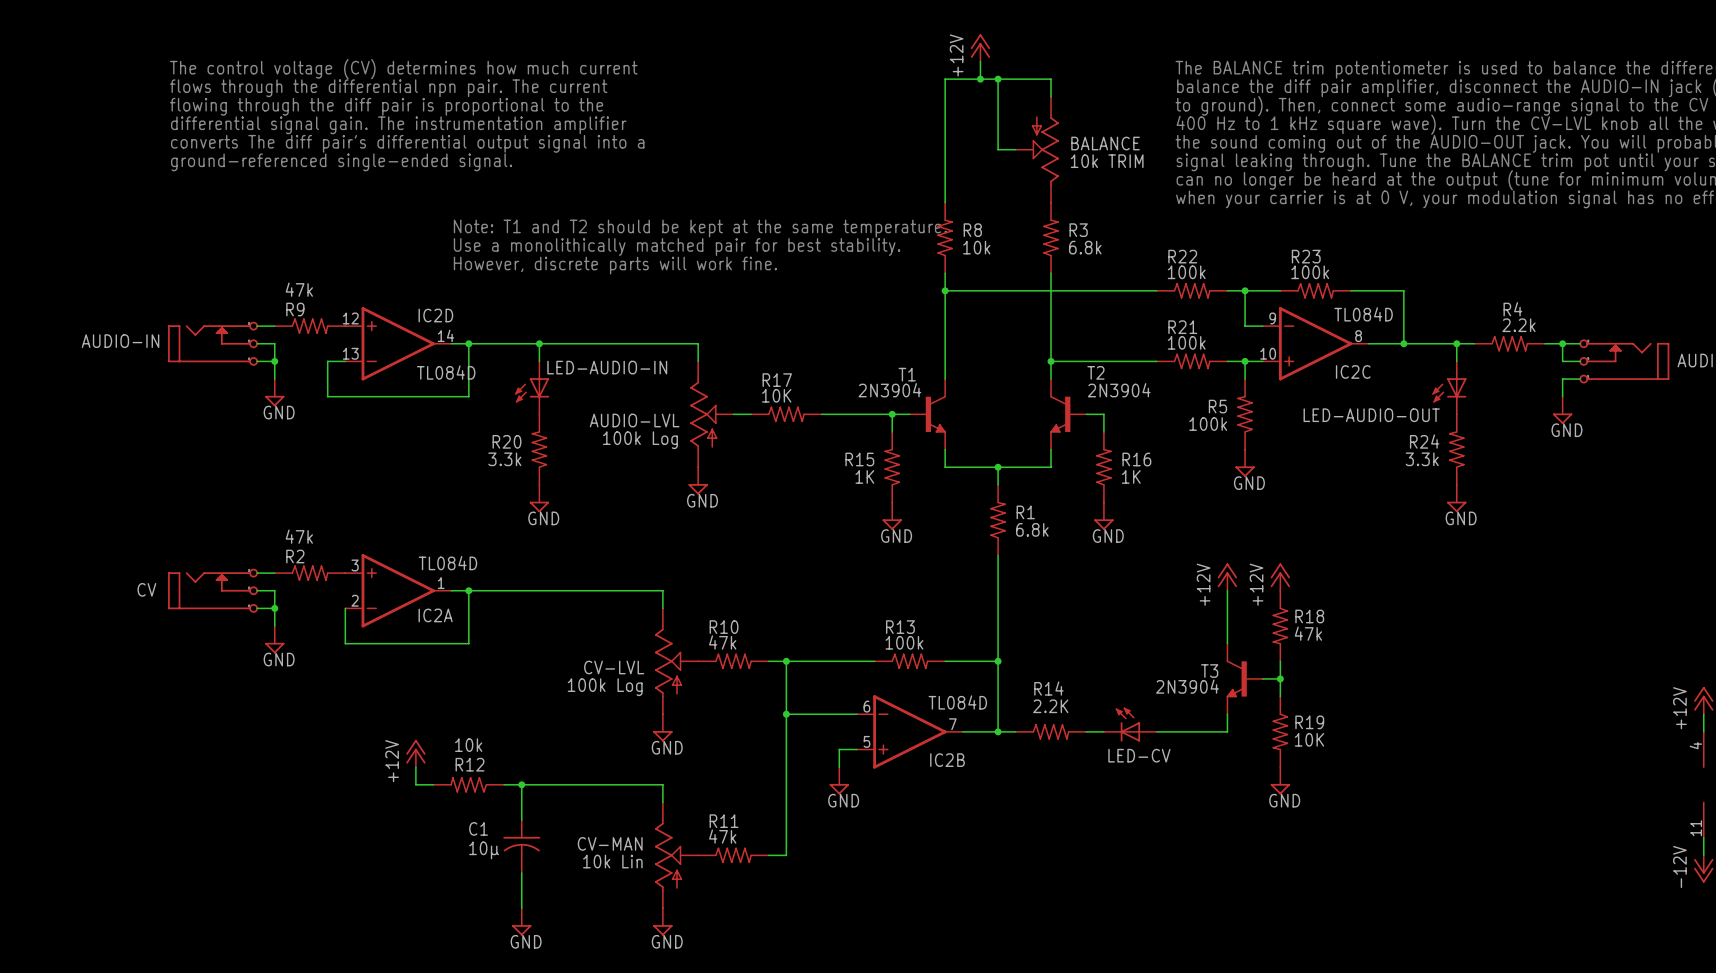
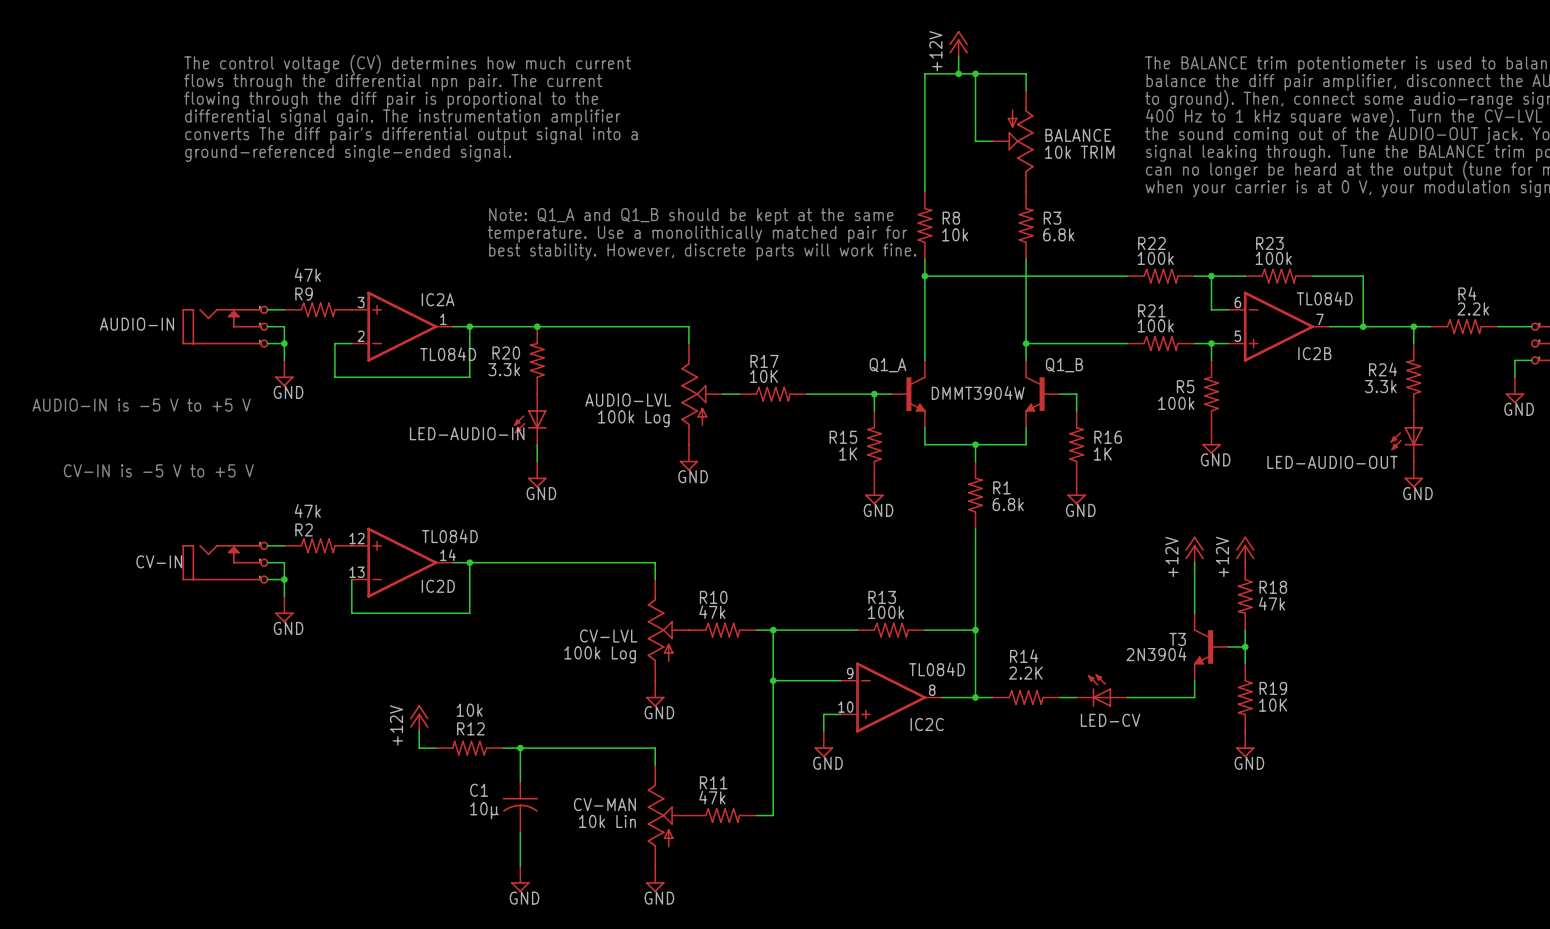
text: Note: T1 and T2 should be kept at the same temperature. (700, 228) -> Note: Q1_A and Q1_B should be kept at the same (691, 216)
text: Use a monolithically matched pair for best stability. (677, 247) -> temperature. Use a monolithically matched pair for (697, 234)
text: However, discrete parts will work fine. (615, 265) -> best stability. However, discrete parts will work fine. (702, 251)
IC2D name position: IC2D (435, 315) -> IC2D (438, 586)
IC2D position: (398, 343) -> (402, 562)
IC2C position: (1315, 343) -> (891, 697)
wire: (1562, 343) (1562, 361) (1580, 361) -> none
junction: (1562, 343) -> none
LED-AUDIO-IN name position: LED-AUDIO-IN (607, 367) -> LED-AUDIO-IN (467, 433)
T2 name: T2 (1095, 372) -> Q1_B (1064, 365)
T1 name: T1 (907, 374) -> Q1_A (887, 365)
LED-AUDIO-IN position: (532, 387) -> (530, 419)
LED-AUDIO-OUT position: (1449, 387) -> (1406, 436)
T1 value: 2N3904 (889, 390) -> none
T2 value: 2N3904 (1119, 390) -> DMMT3904W (978, 393)
text: none -> AUDIO-IN is -5 V to +5 V (141, 405)
R20 position: (539, 449) -> (537, 360)
R24 position: (1456, 449) -> (1413, 377)
text: none -> CV-IN is -5 V to +5 V (158, 470)
CV name: CV (146, 589) -> CV-IN (159, 561)
IC2A position: (398, 590) -> (402, 326)
IC2A name position: IC2A (435, 615) -> IC2A (438, 299)
IC2B position: (909, 731) -> (1278, 326)

